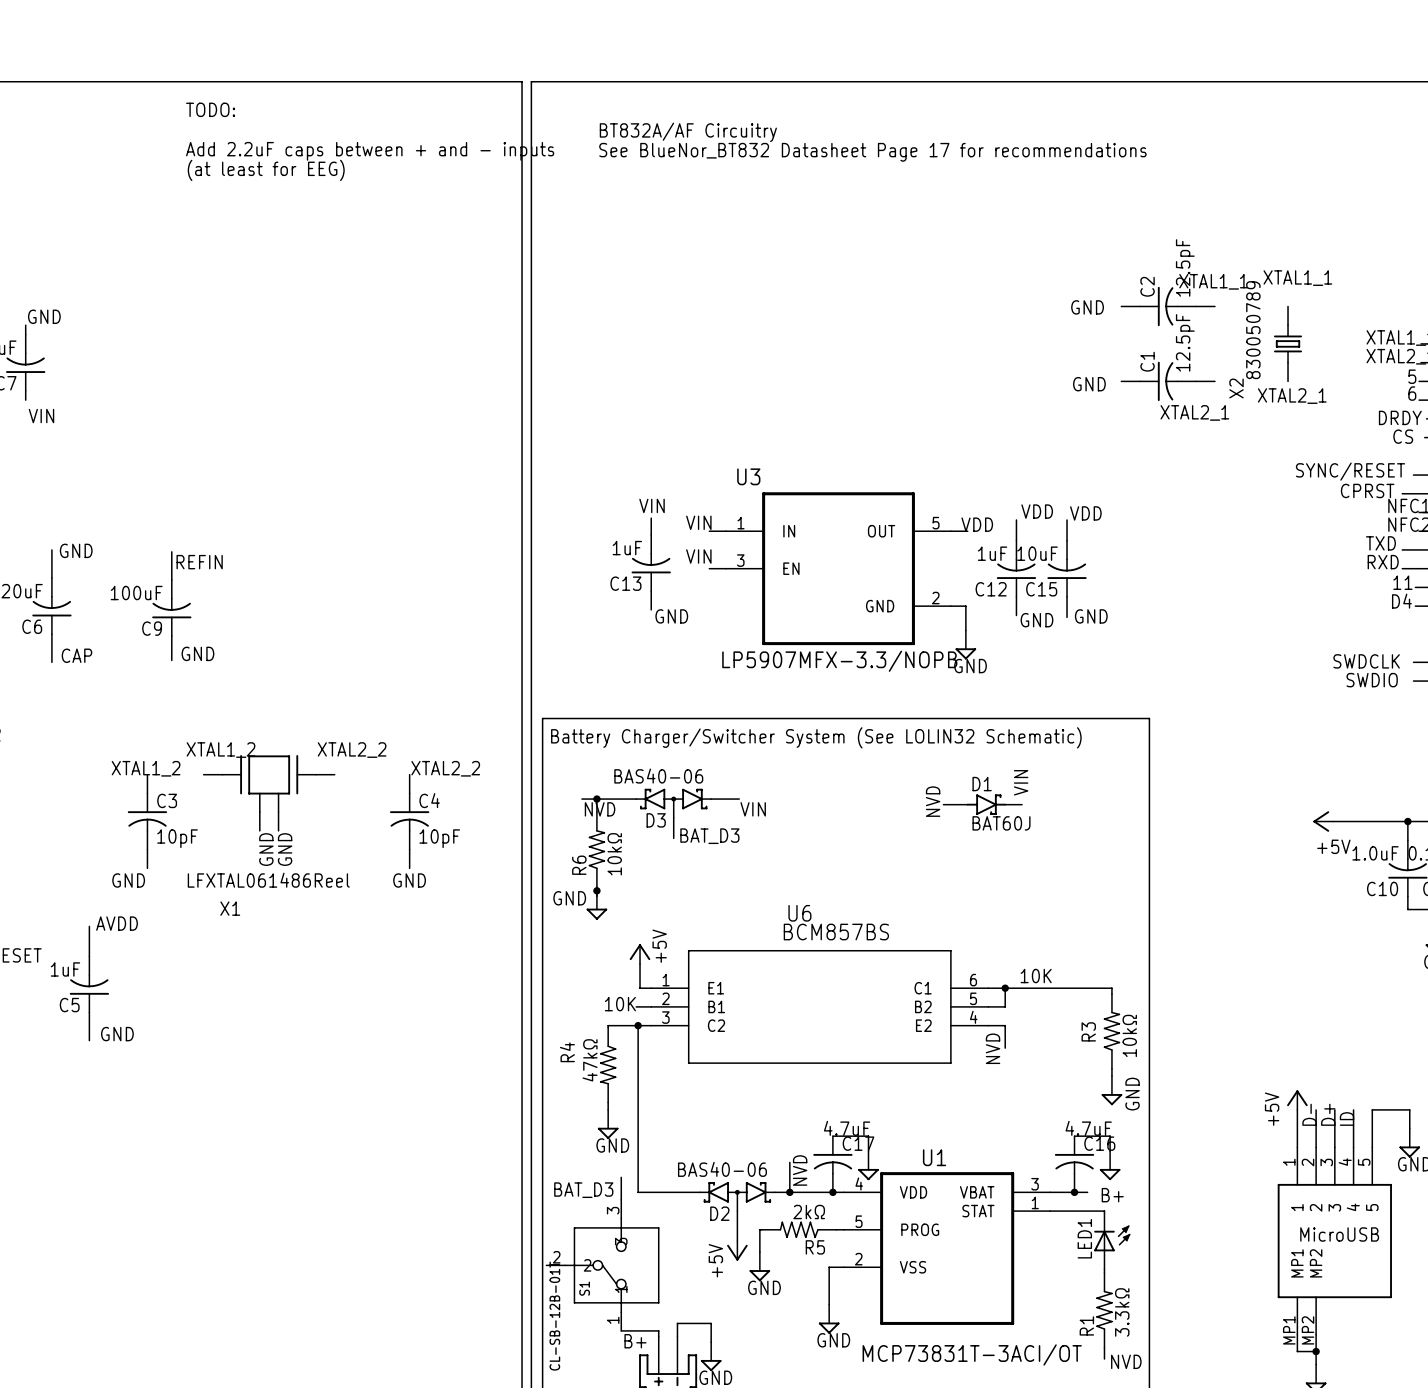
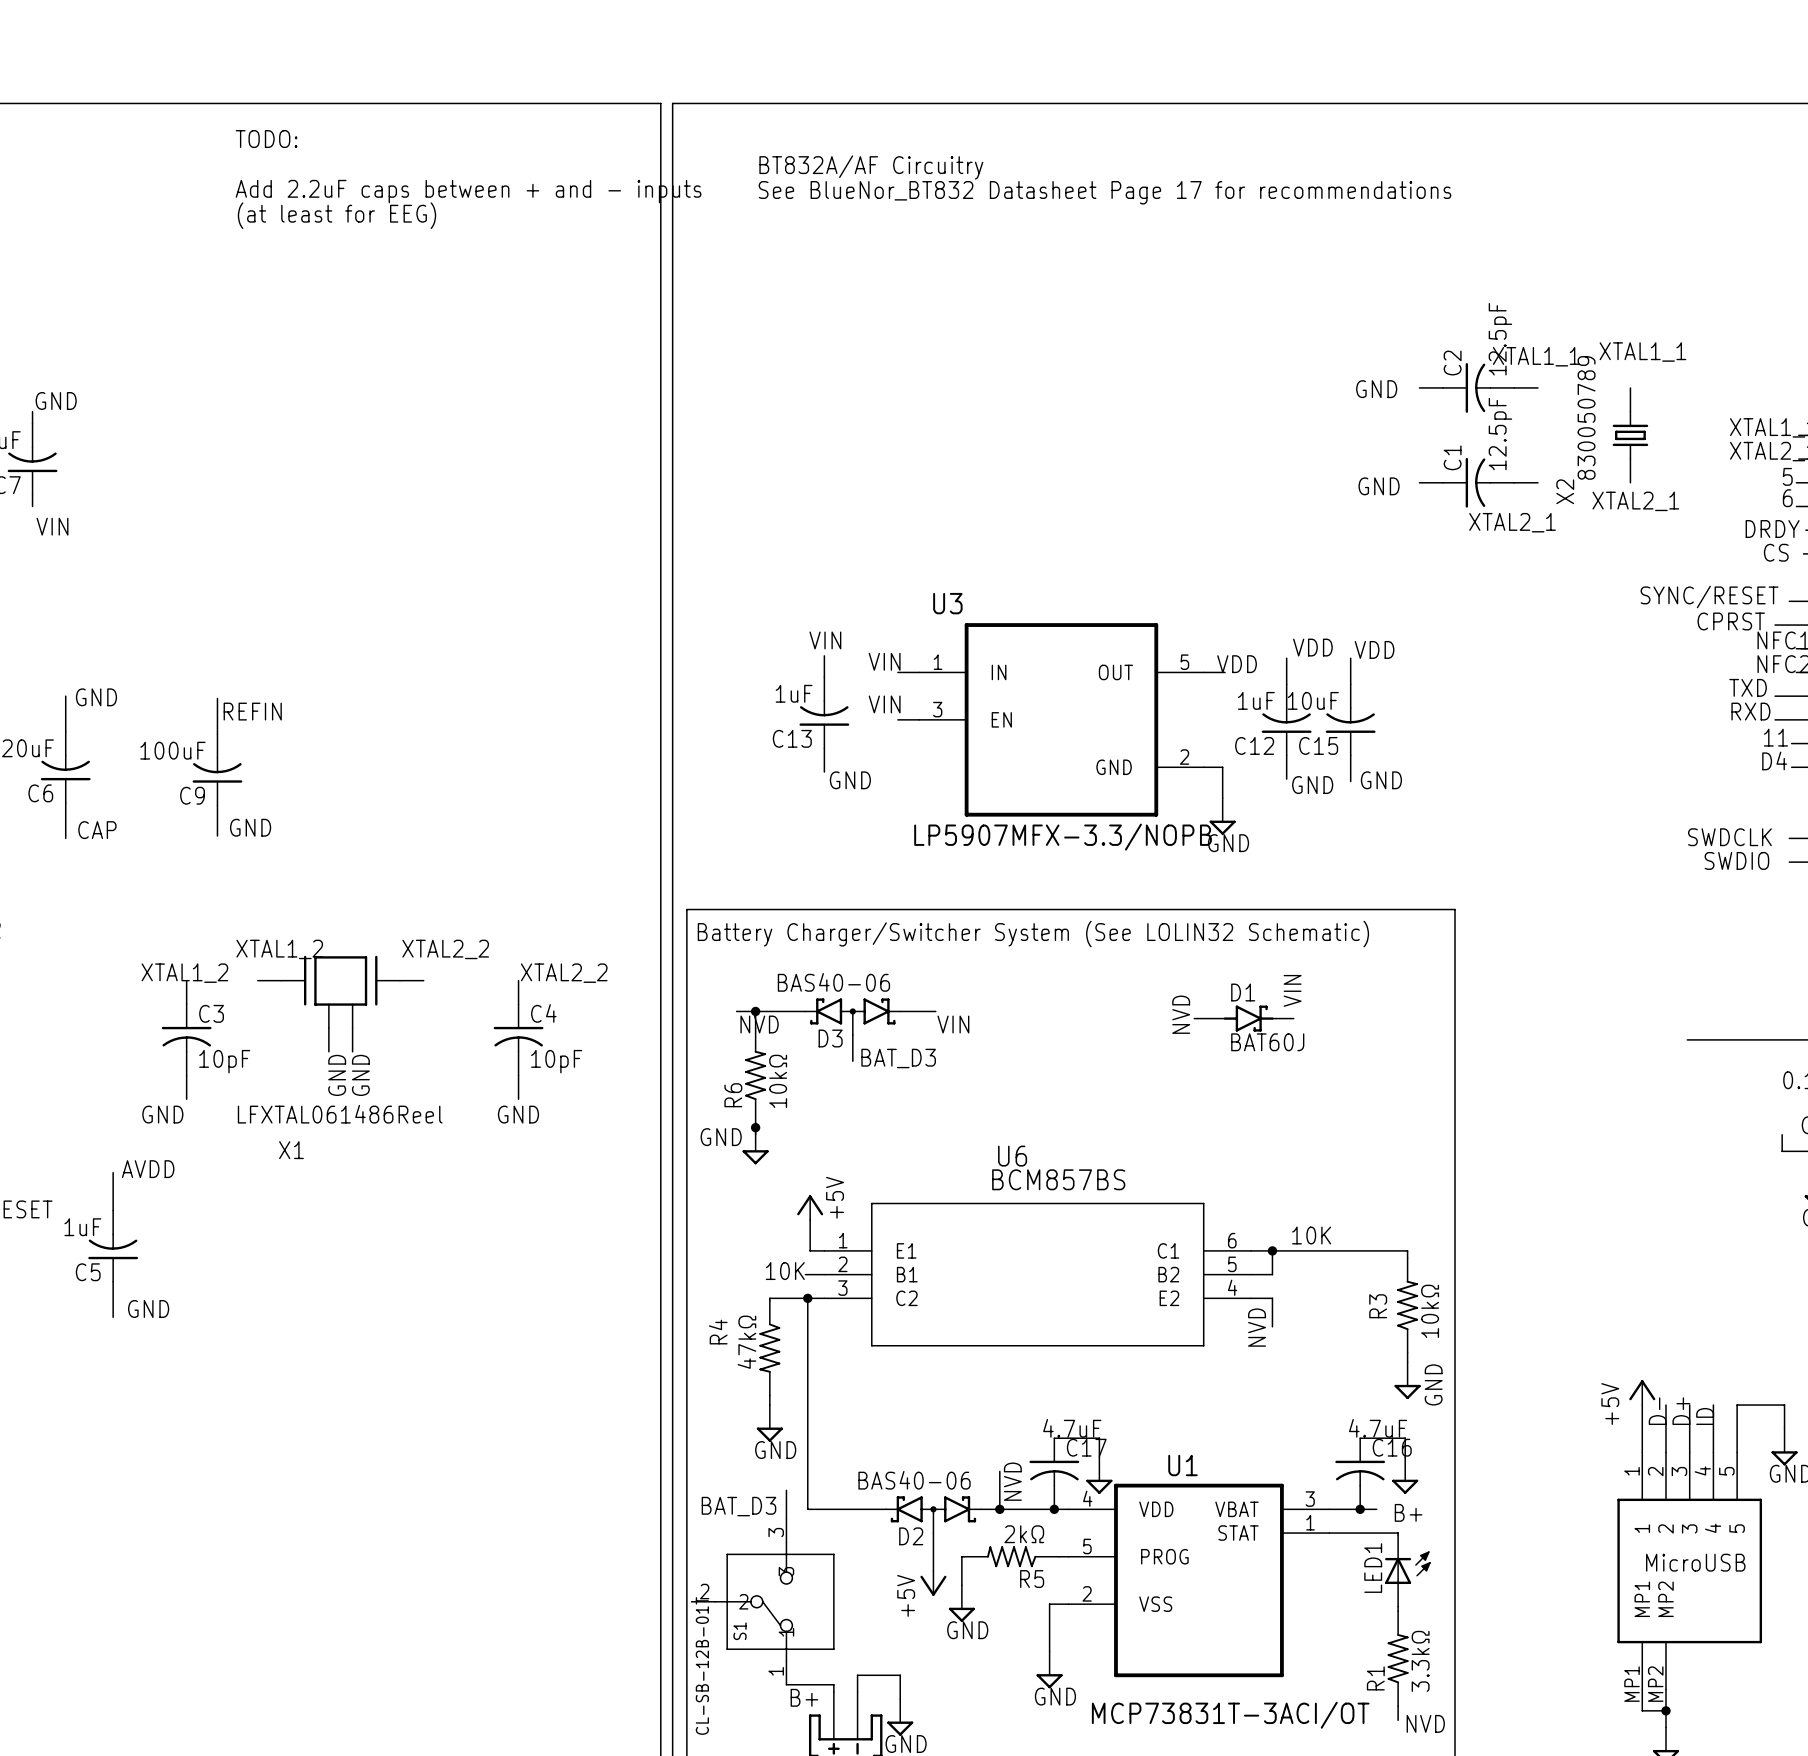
power symbol: +5V (1323, 821) -> none
wire: (1407, 821) (1407, 840) -> none
junction: (1407, 821) -> none
C10: 1.0uF (1407, 868) -> none

